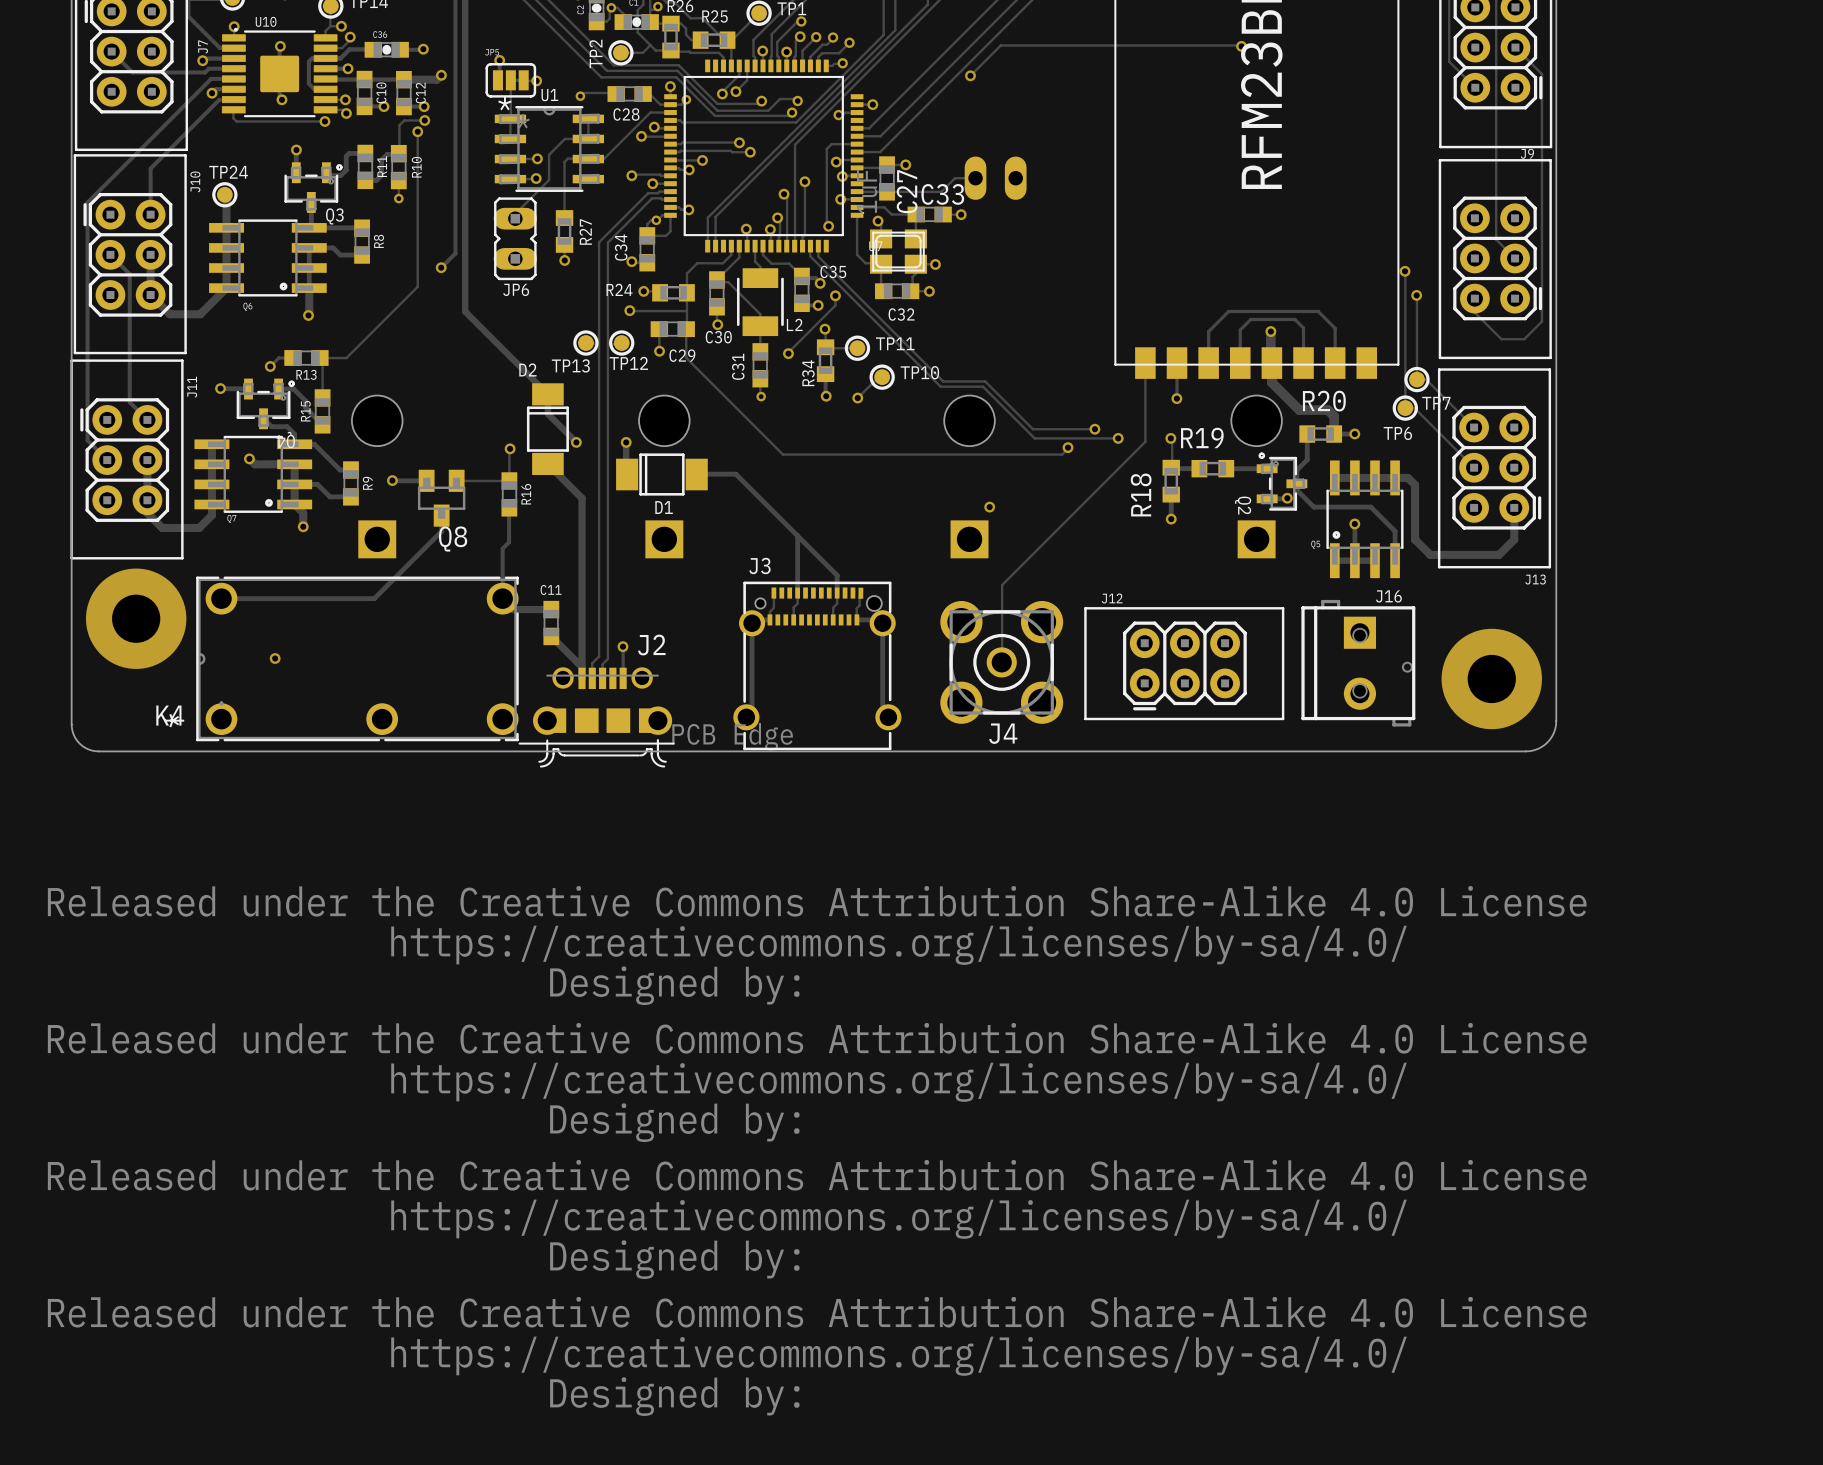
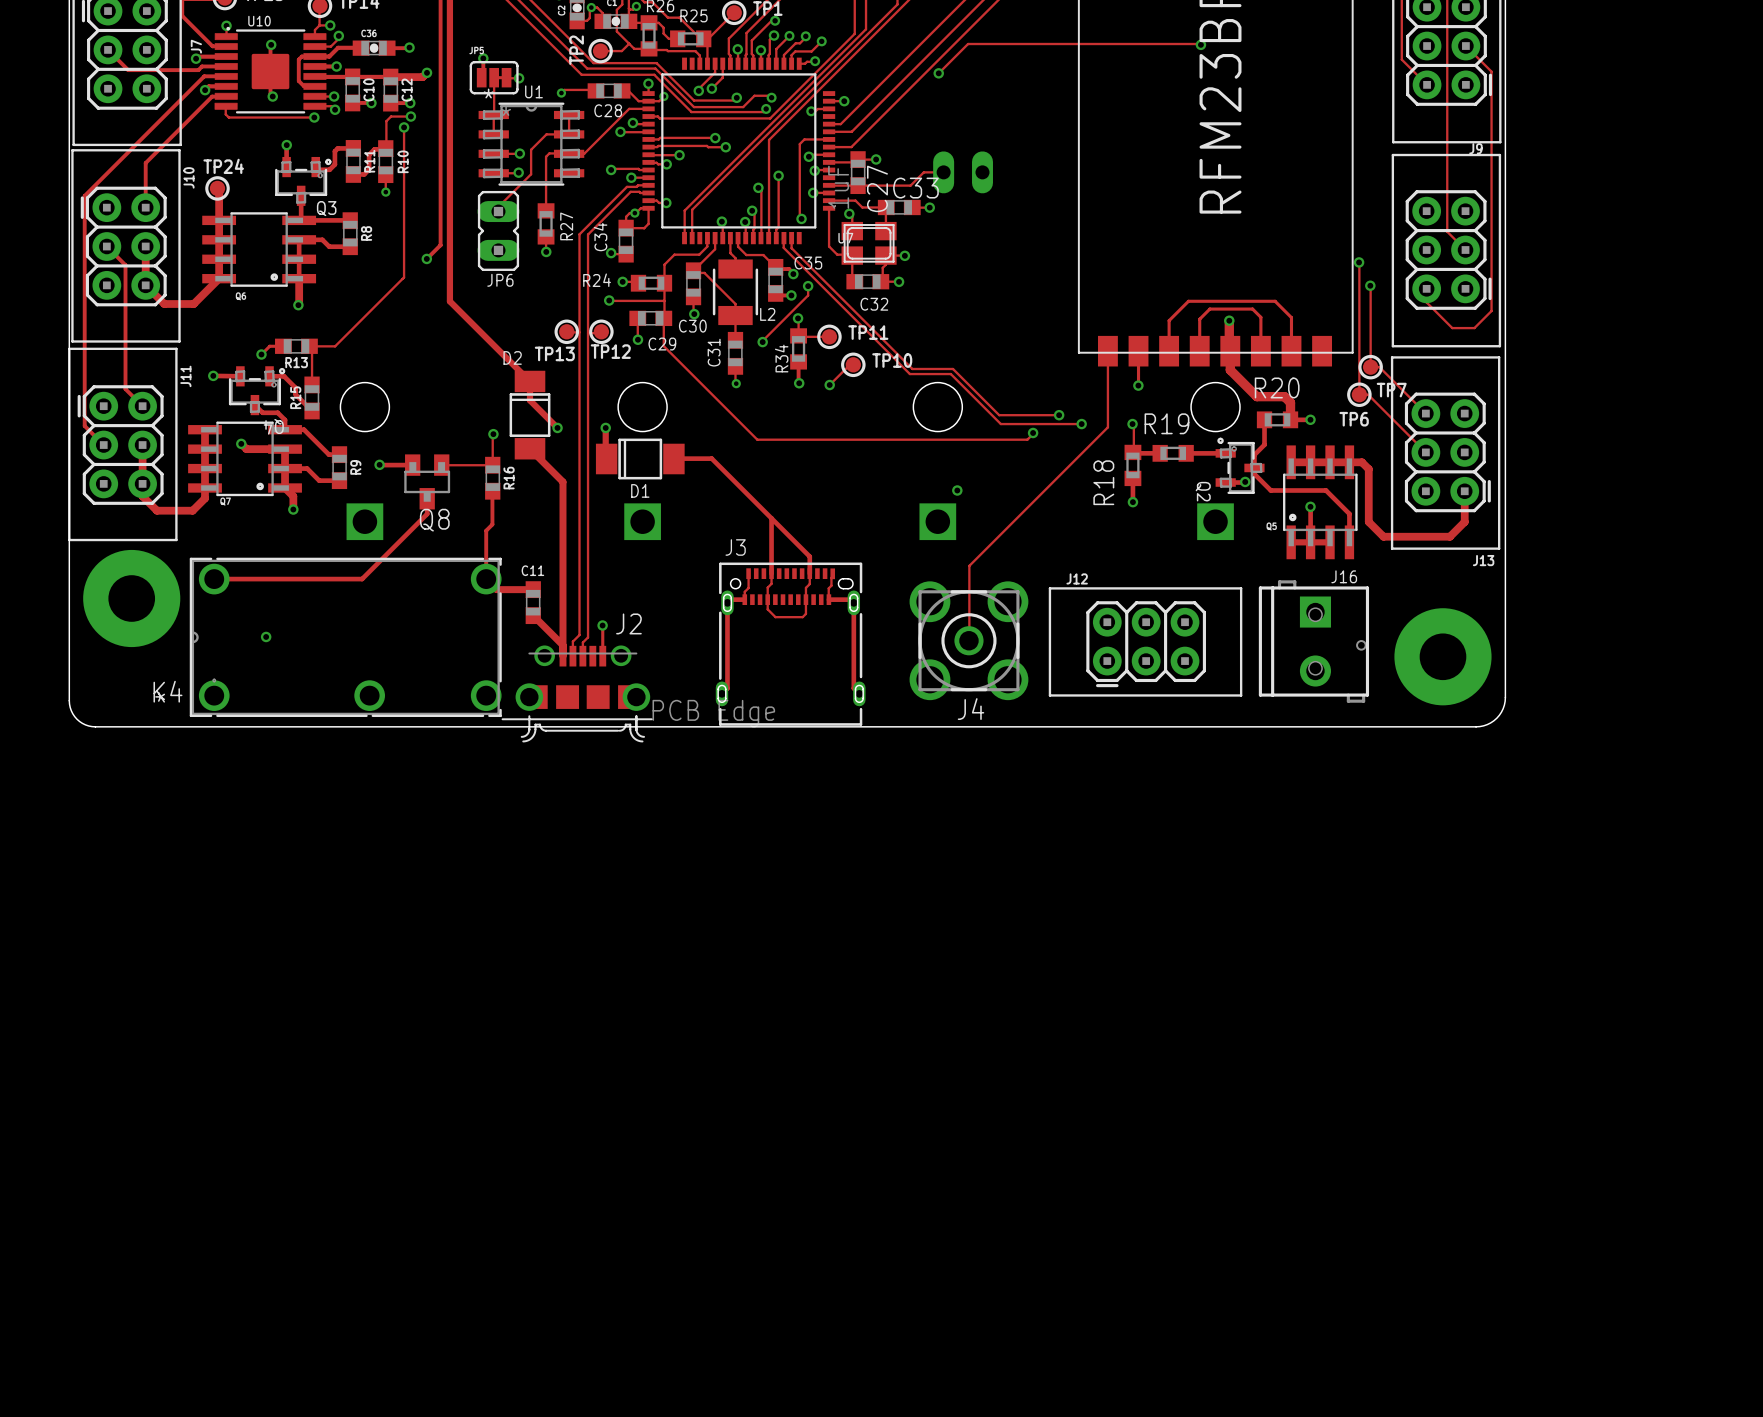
J3 footprint: [733, 581, 902, 751] -> [715, 562, 866, 726]
track: none -> (767, 599) (767, 609) (775, 617) (802, 617) (805, 613) (805, 599)
drawing: [47, 886, 1587, 1416] -> none

